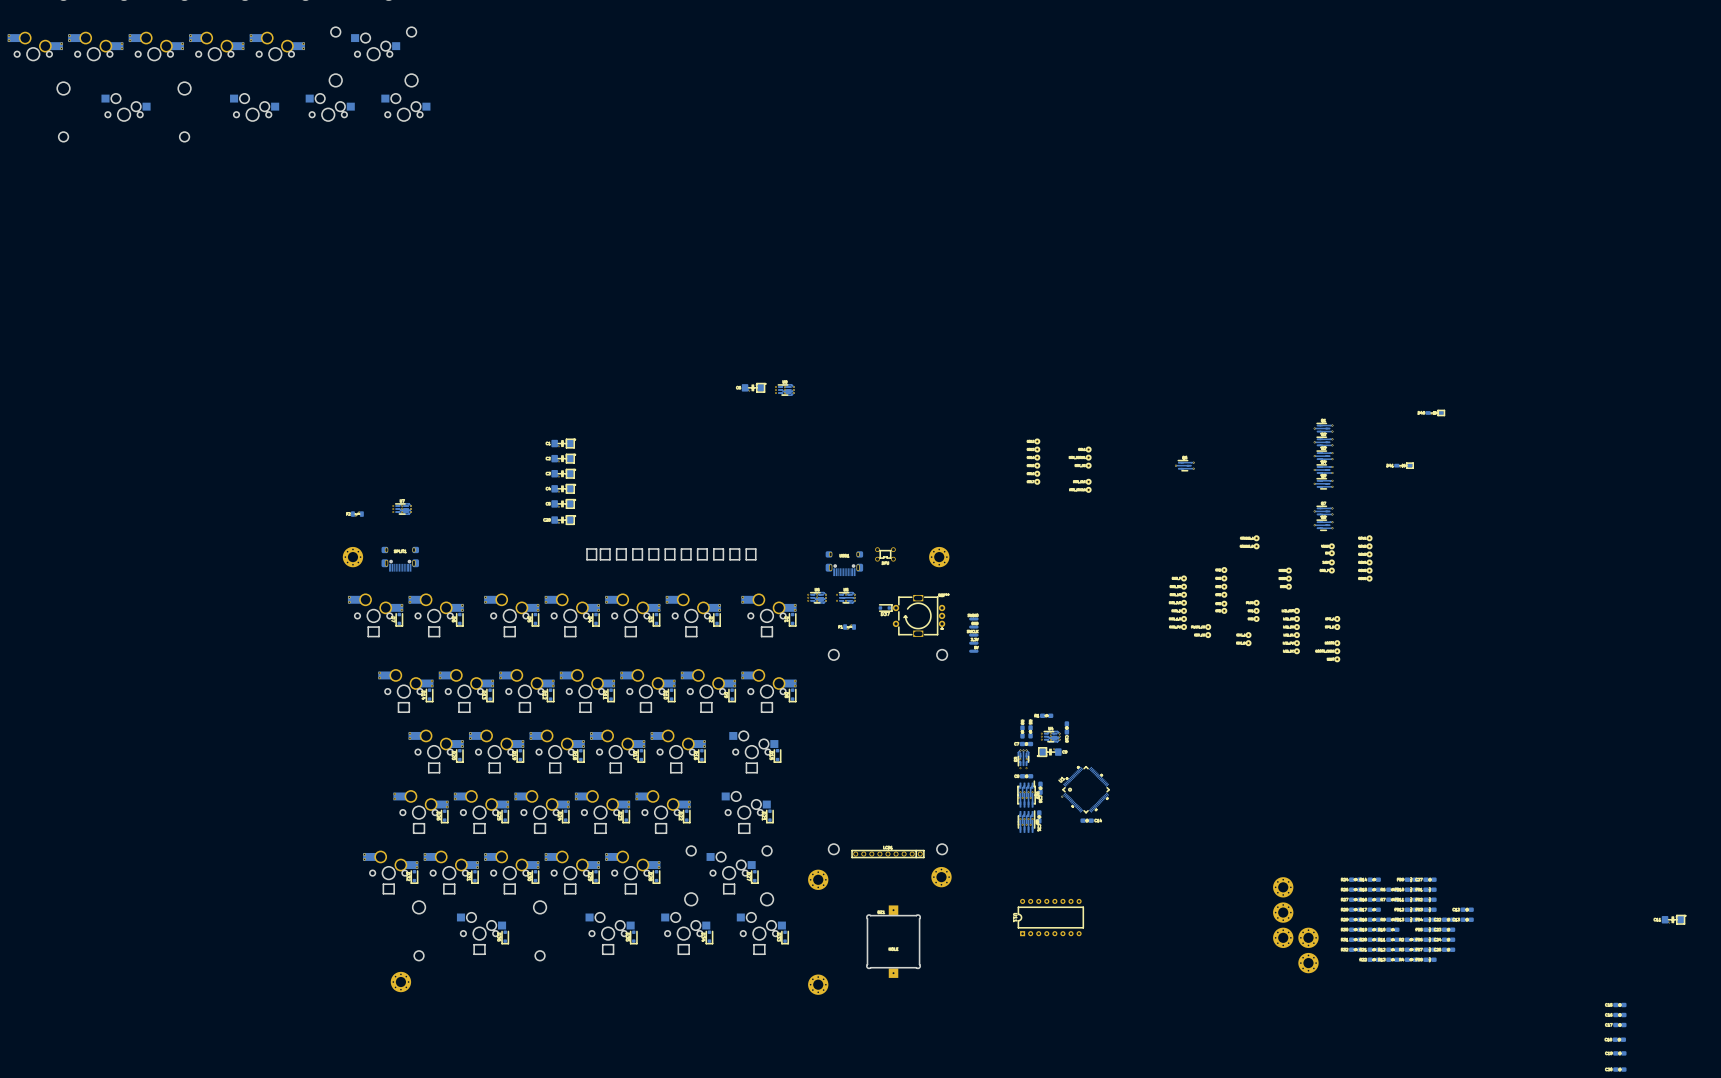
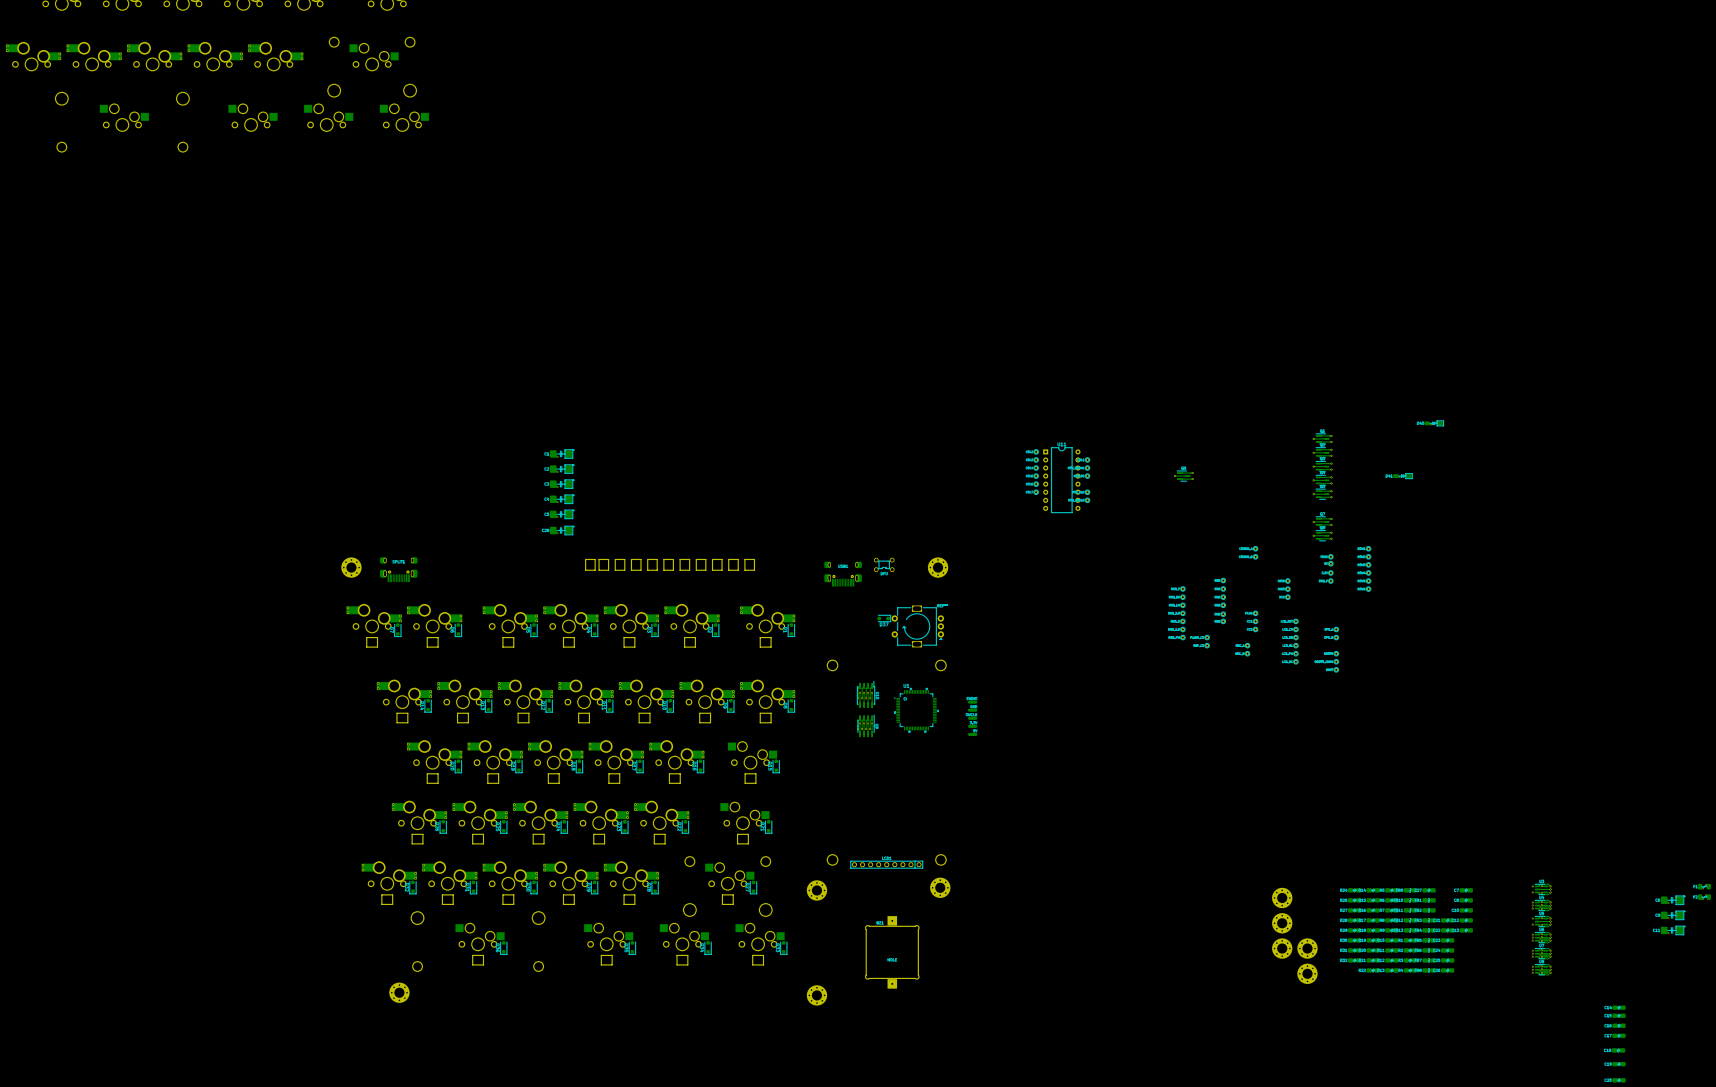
part position: (753, 387) -> (1673, 900)
part position: (784, 390) -> (1541, 969)
part position: (402, 509) -> (1541, 953)
part position: (357, 514) -> (1704, 897)
part position: (817, 597) -> (1541, 937)
part position: (845, 597) -> (1541, 921)
part position: (849, 627) -> (1704, 886)
part position: (973, 635) -> (972, 718)
part position: (1046, 715) -> (1410, 940)
part rotation: 0° (1066, 727) -> 90° clockwise (1466, 910)
part position: (1066, 727) -> (1466, 910)
part rotation: 0° (1022, 731) -> 90° counterclockwise (1391, 920)
part position: (1022, 731) -> (1391, 920)
part rotation: 0° (1030, 731) -> 90° counterclockwise (1391, 890)
part position: (1030, 731) -> (1391, 890)
part position: (1050, 736) -> (1541, 905)
part position: (1026, 744) -> (1466, 890)
part rotation: 0° (1049, 752) -> 180° (1673, 915)
part position: (1049, 752) -> (1673, 915)
part rotation: 0° (1023, 759) -> 90° clockwise (1541, 889)
part position: (1023, 759) -> (1541, 889)
part position: (1026, 776) -> (1466, 900)
part rotation: 0° (1040, 788) -> 90° clockwise (1447, 970)
part position: (1040, 788) -> (1447, 970)
part rotation: 0° (1085, 789) -> 45° clockwise (916, 710)
part position: (1085, 789) -> (916, 710)
part position: (1026, 794) -> (866, 694)
part rotation: 0° (1039, 816) -> 90° clockwise (1447, 920)
part position: (1039, 816) -> (1447, 920)
part rotation: 0° (1087, 820) -> 180° (1619, 1007)
part position: (1087, 820) -> (1619, 1007)
part position: (1026, 821) -> (865, 726)
part rotation: 0° (1050, 917) -> 90° clockwise (1061, 480)
part position: (1050, 917) -> (1061, 480)

